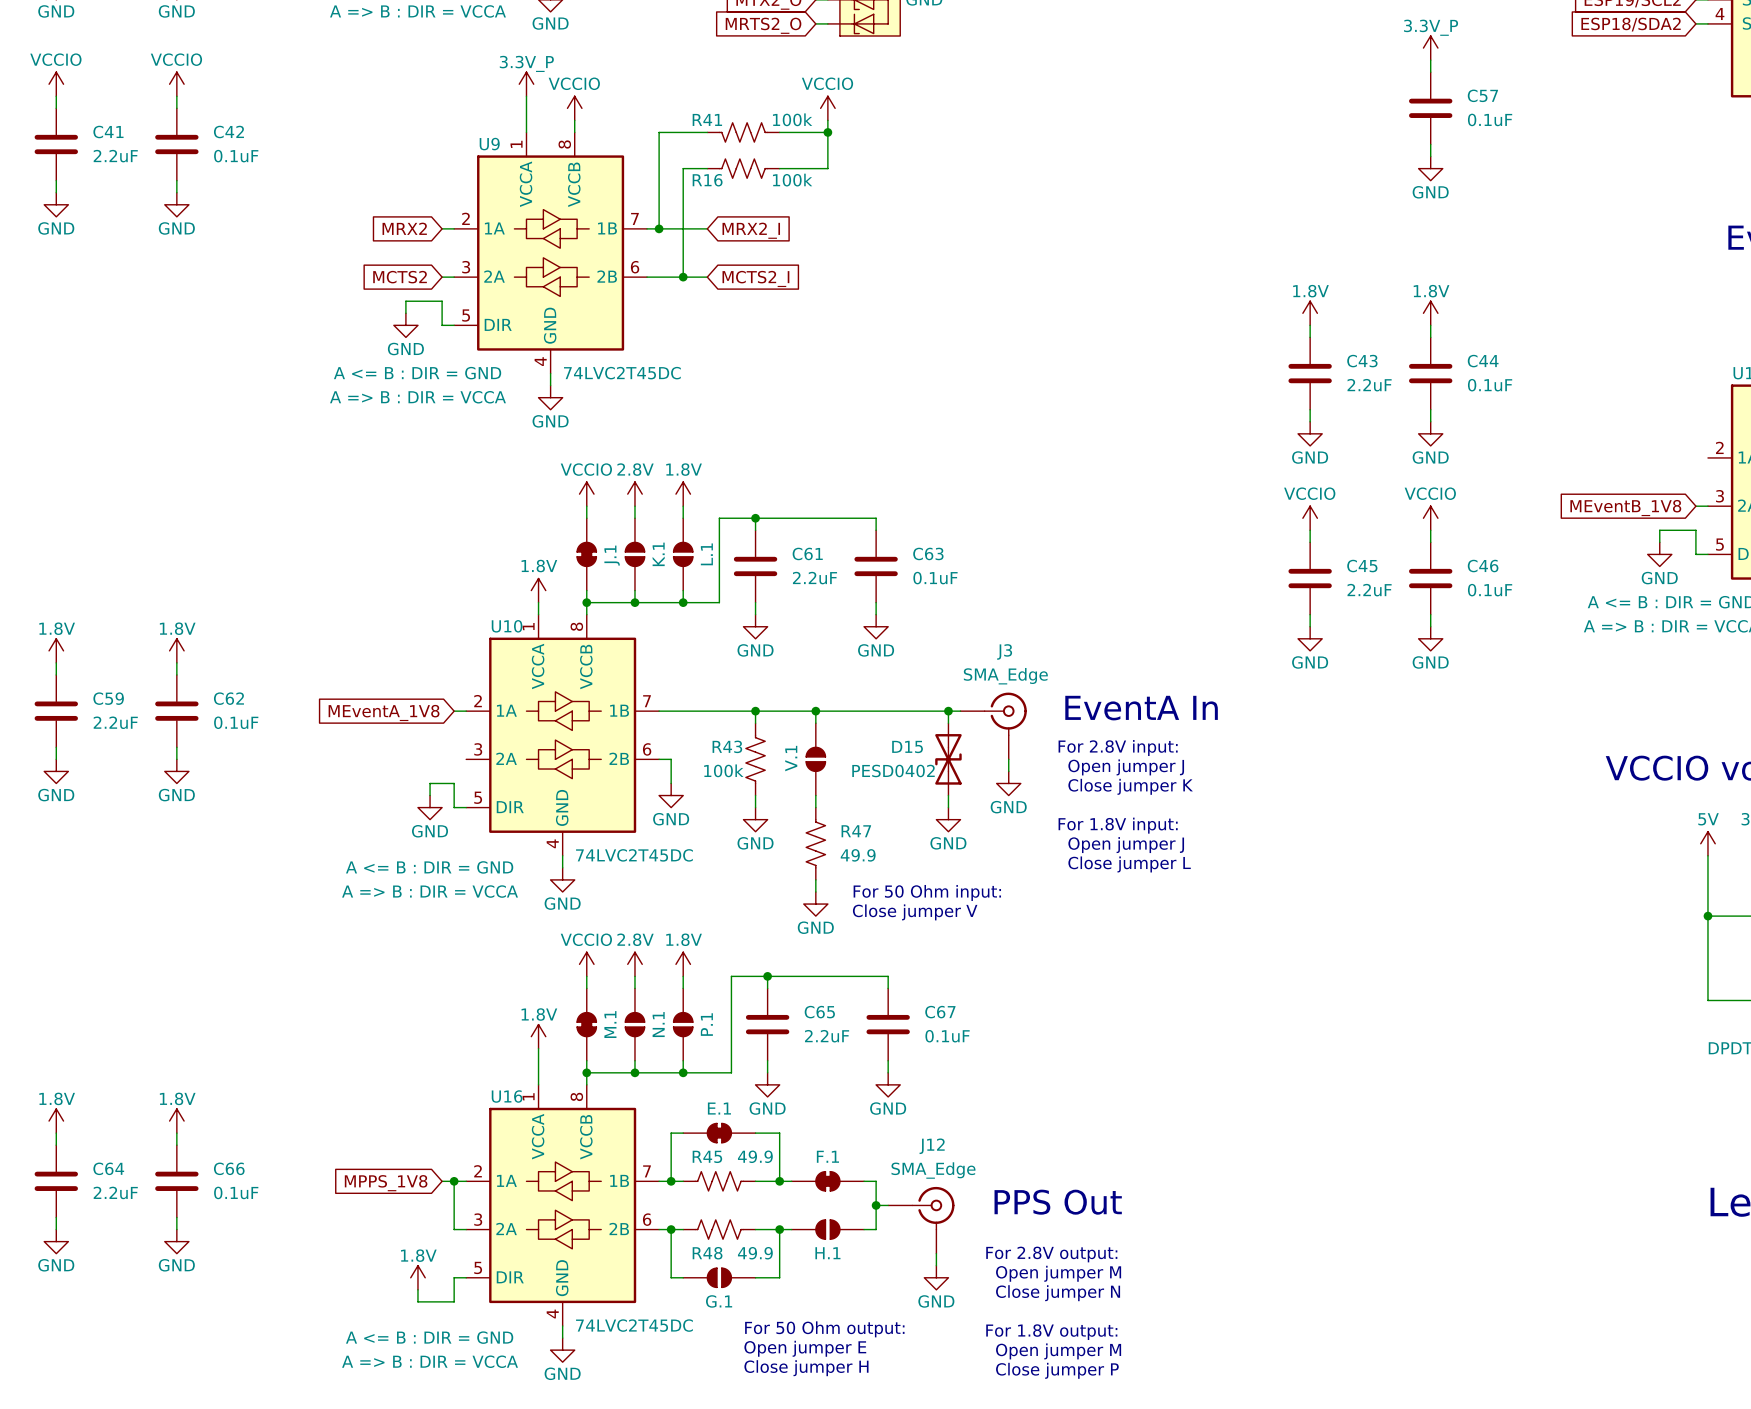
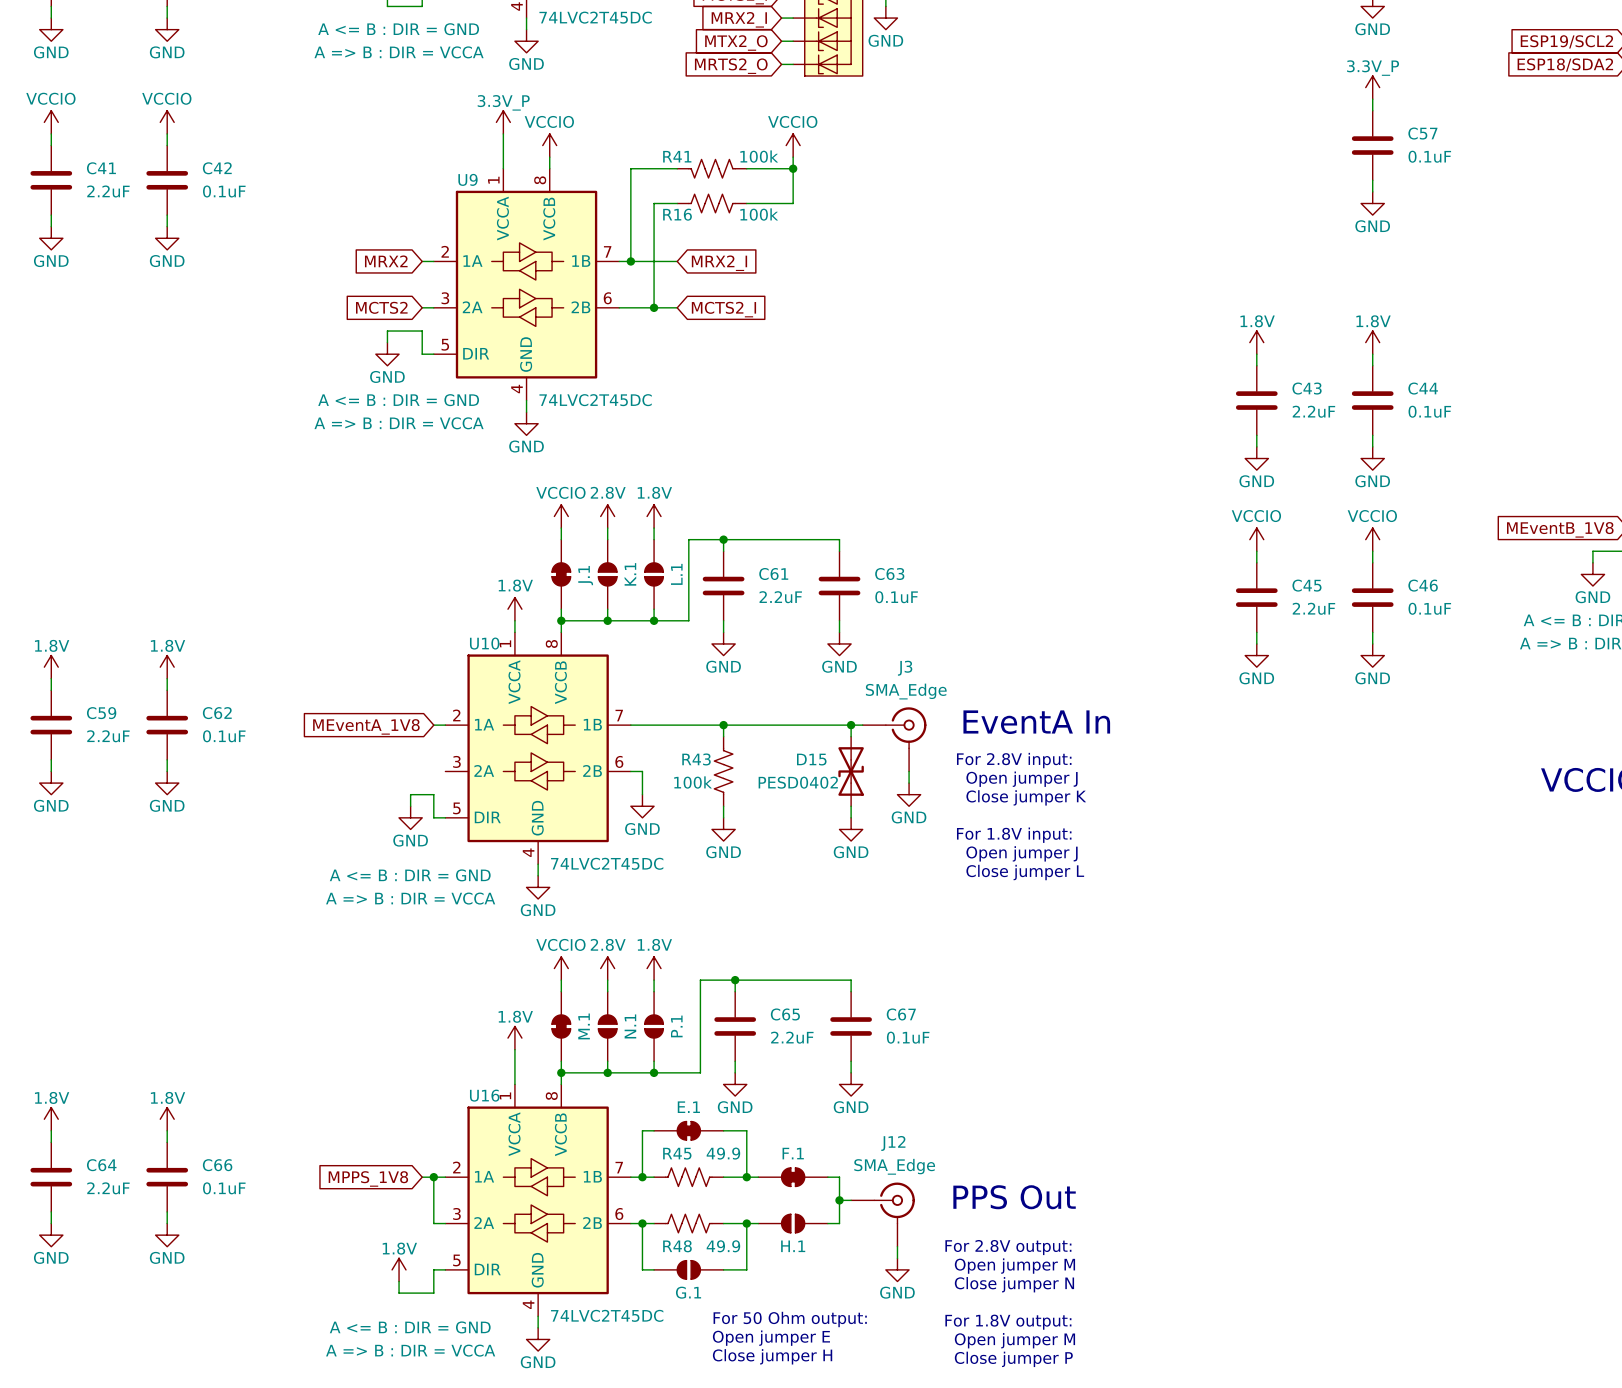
text position: EventA In (1141, 708) -> EventA In (1036, 722)
wire: (815, 711) (815, 723) -> none
junction: (815, 711) -> none
junction: none -> (851, 725)
wire: (948, 711) (948, 723) -> (851, 725) (851, 736)
junction: (948, 711) -> none
J3 position: (993, 725) -> (894, 739)
text position: For 2.8V input: (1118, 748) -> For 2.8V input: (1014, 760)
V.1: (815, 759) -> none
D15 position: (948, 759) -> (851, 771)
text position: Open jumper J (1126, 767) -> Open jumper J (1022, 779)
power symbol: none -> GND (909, 794)
power symbol: GND (1008, 783) -> none
text position: Close jumper K (1130, 786) -> Close jumper K (1026, 797)
wire: (815, 795) (815, 807) -> none
wire: (948, 795) (948, 807) -> (851, 806) (851, 817)
power symbol: none -> GND (851, 829)
power symbol: GND (948, 819) -> none
text position: For 1.8V input: (1118, 825) -> For 1.8V input: (1014, 835)
R47: 49.9 (815, 843) -> none
text position: Open jumper J (1126, 845) -> Open jumper J (1022, 853)
text position: Close jumper L (1129, 864) -> Close jumper L (1025, 872)
wire: (815, 879) (815, 891) -> none
text: For 50 Ohm input: (927, 892) -> none
power symbol: GND (815, 904) -> none
text: Close jumper V (915, 912) -> none

